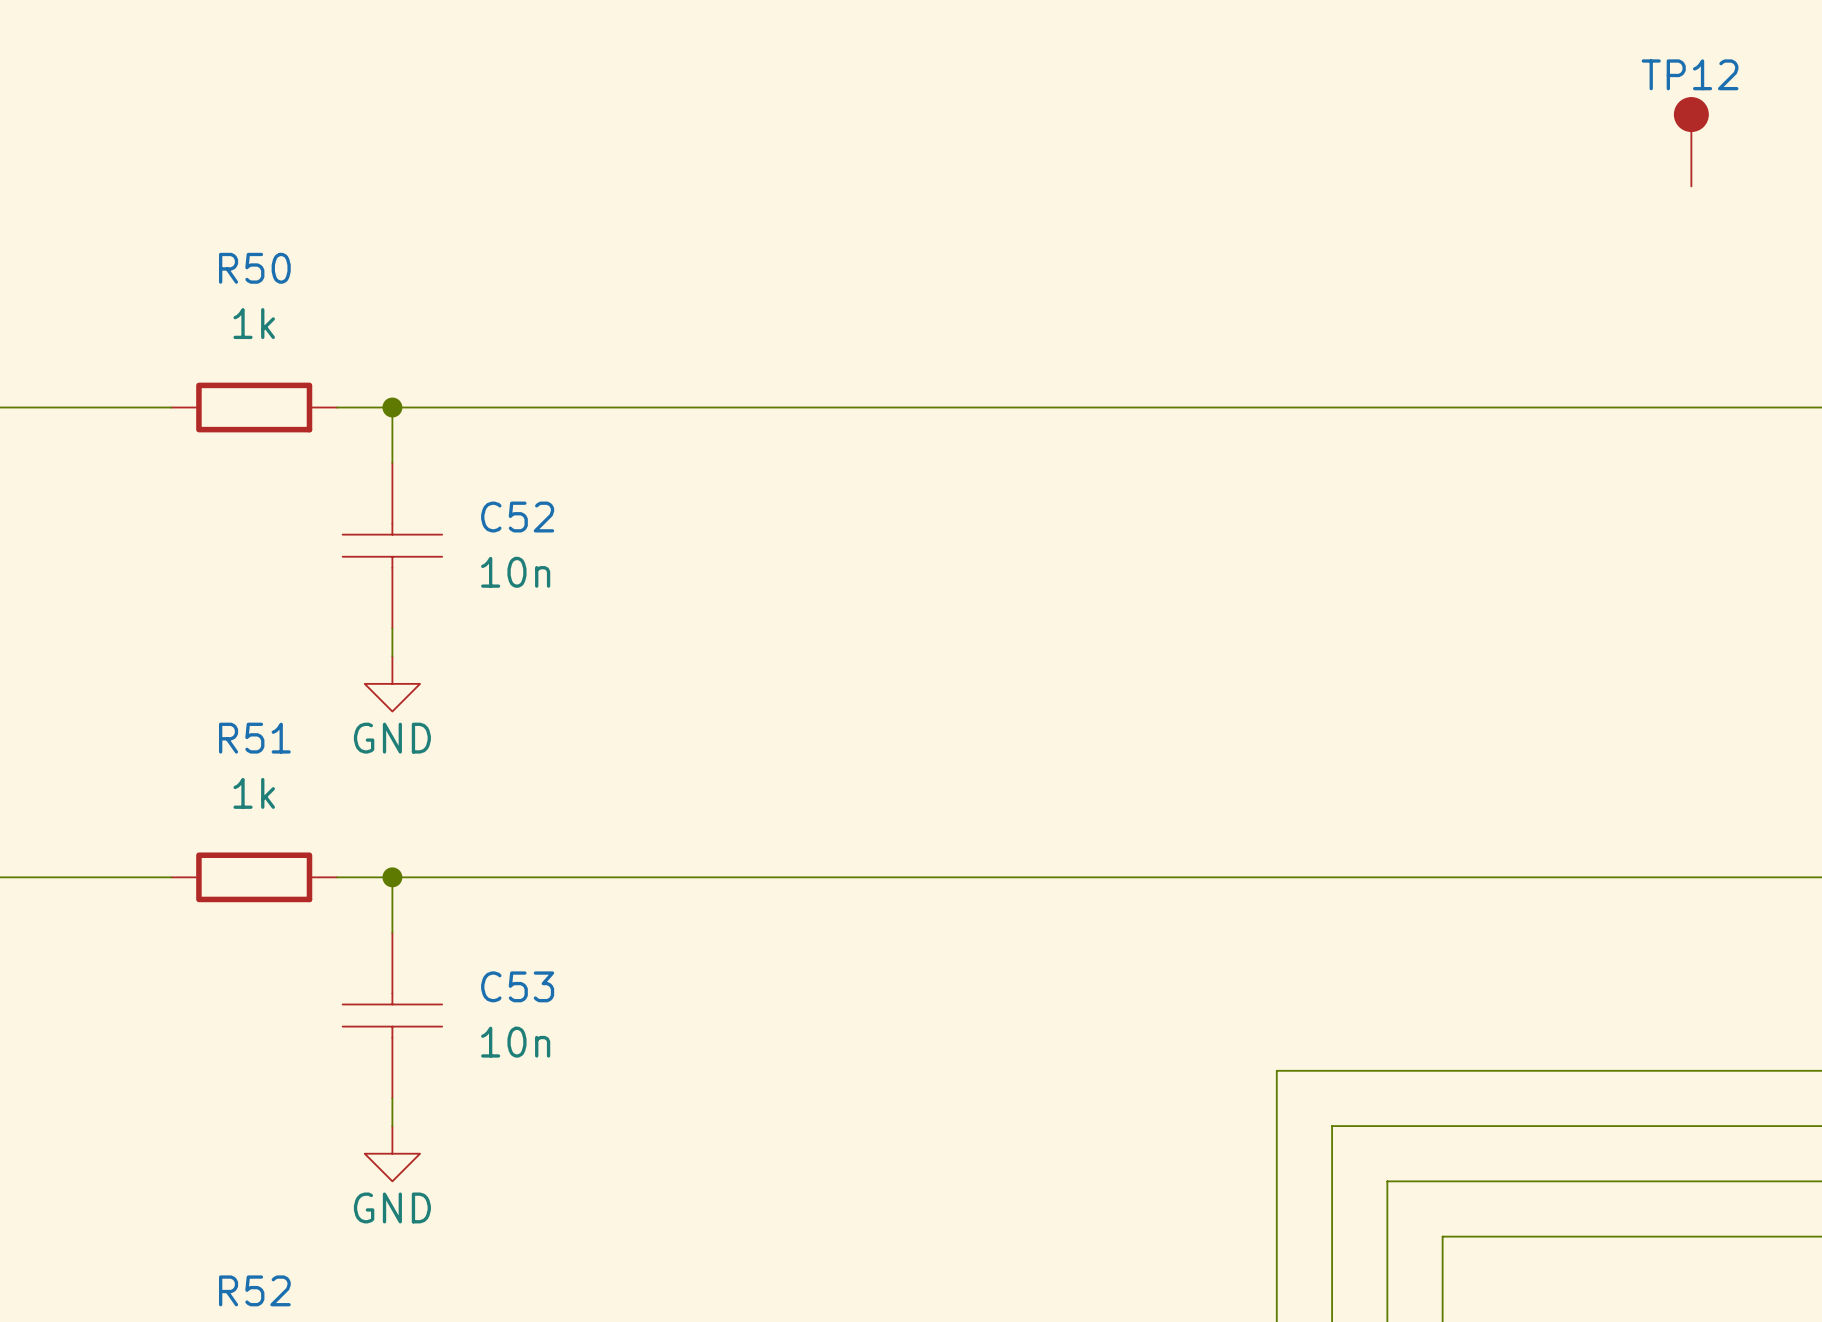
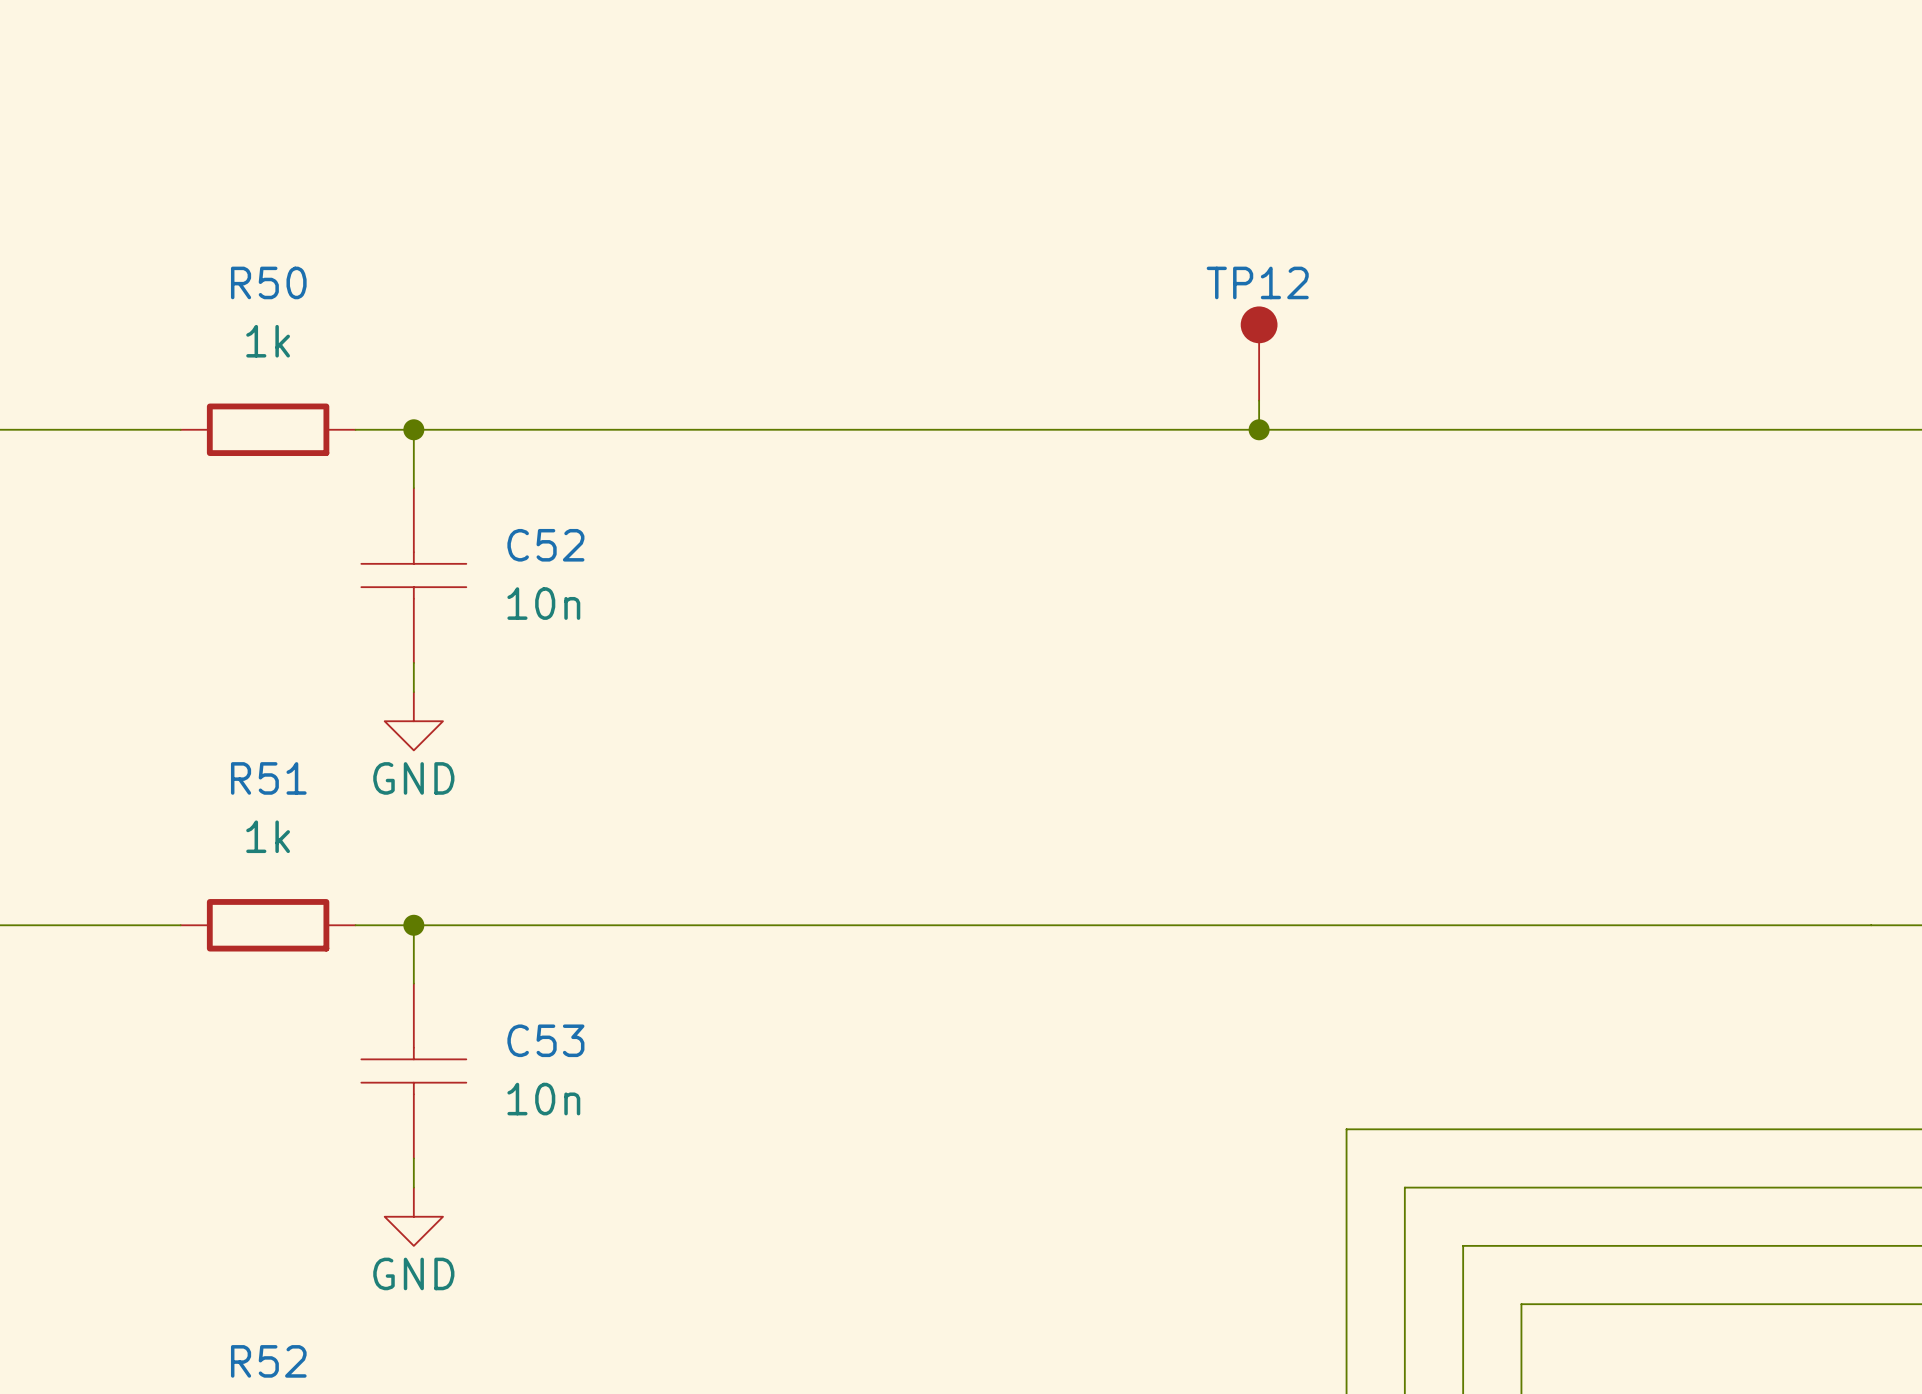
TP12 position: (1691, 142) -> (1259, 353)
wire: none -> (1259, 400) (1259, 429)
junction: none -> (1259, 429)

